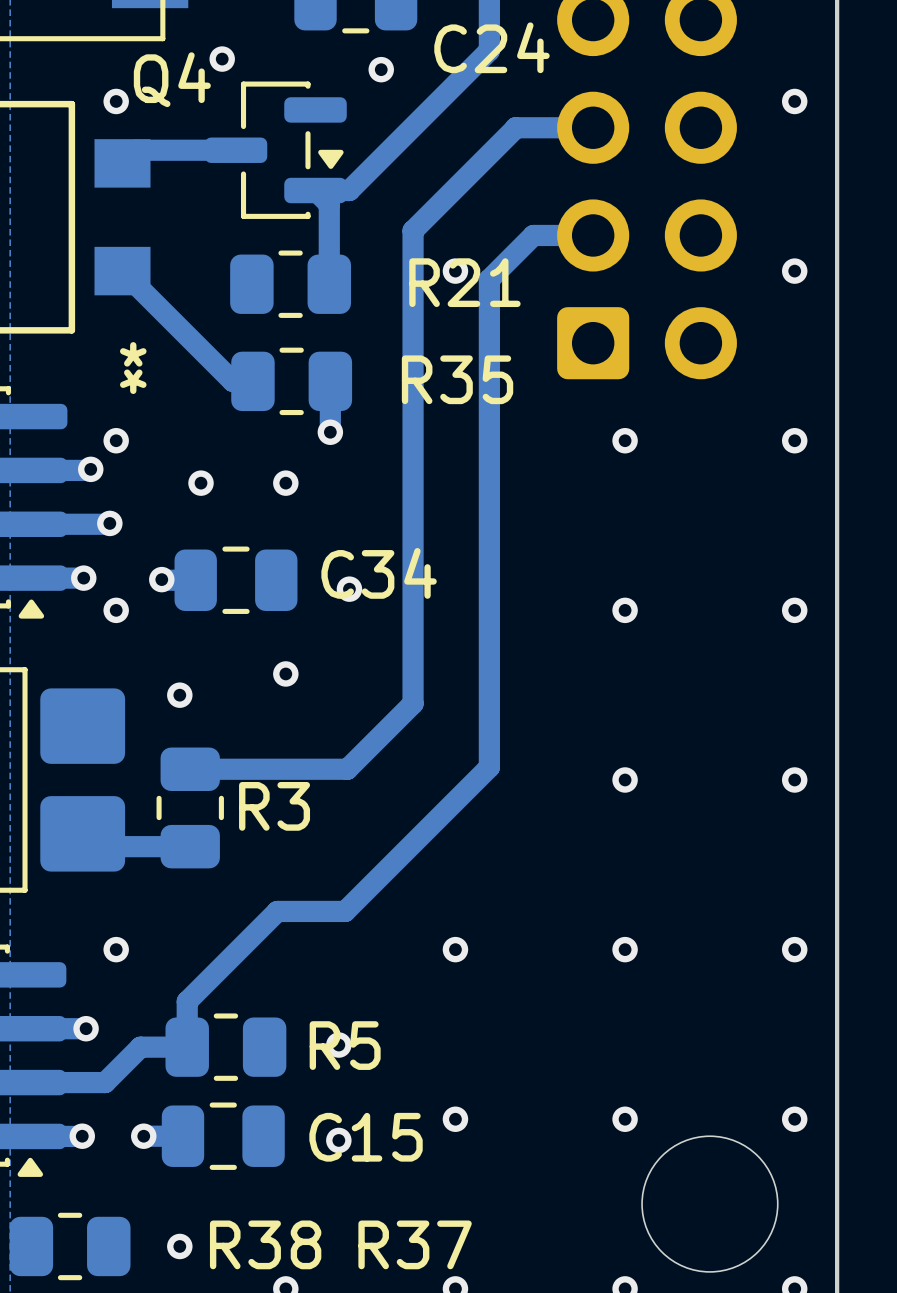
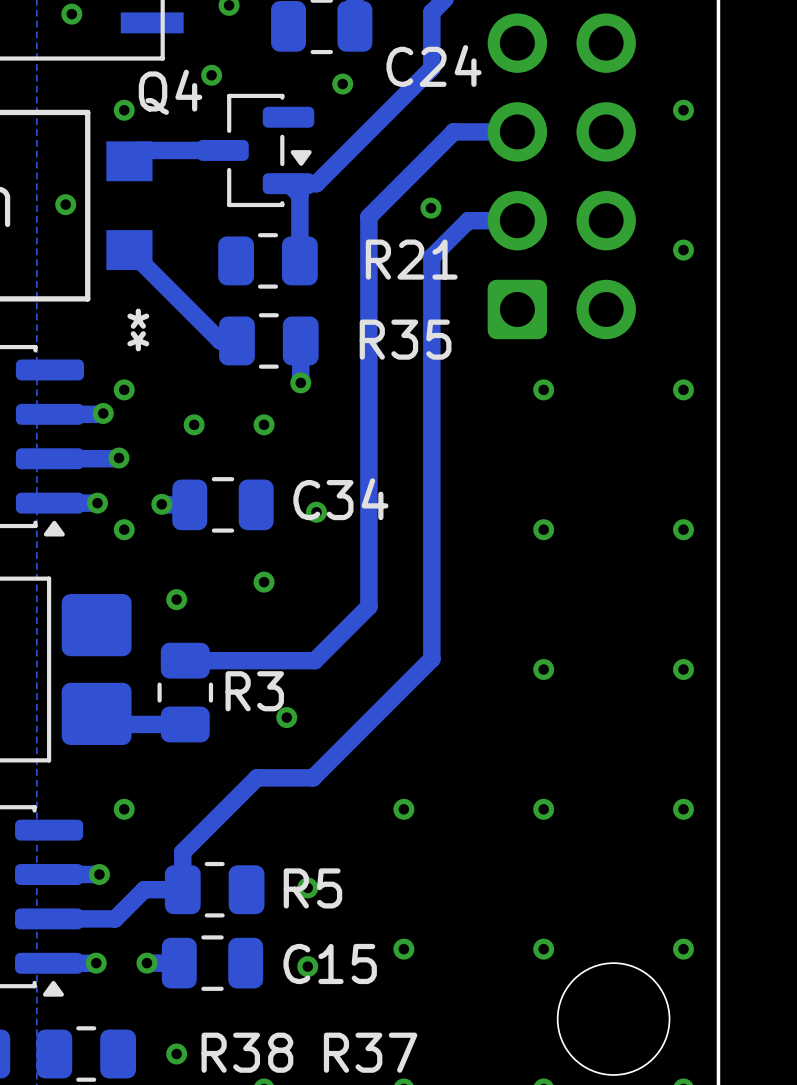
via: none -> (65, 204)
via position: (455, 271) -> (430, 208)
via: none -> (286, 717)

